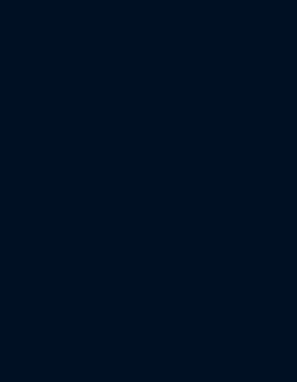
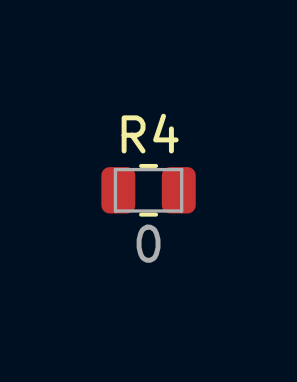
R4: none -> 0 (148, 190)

